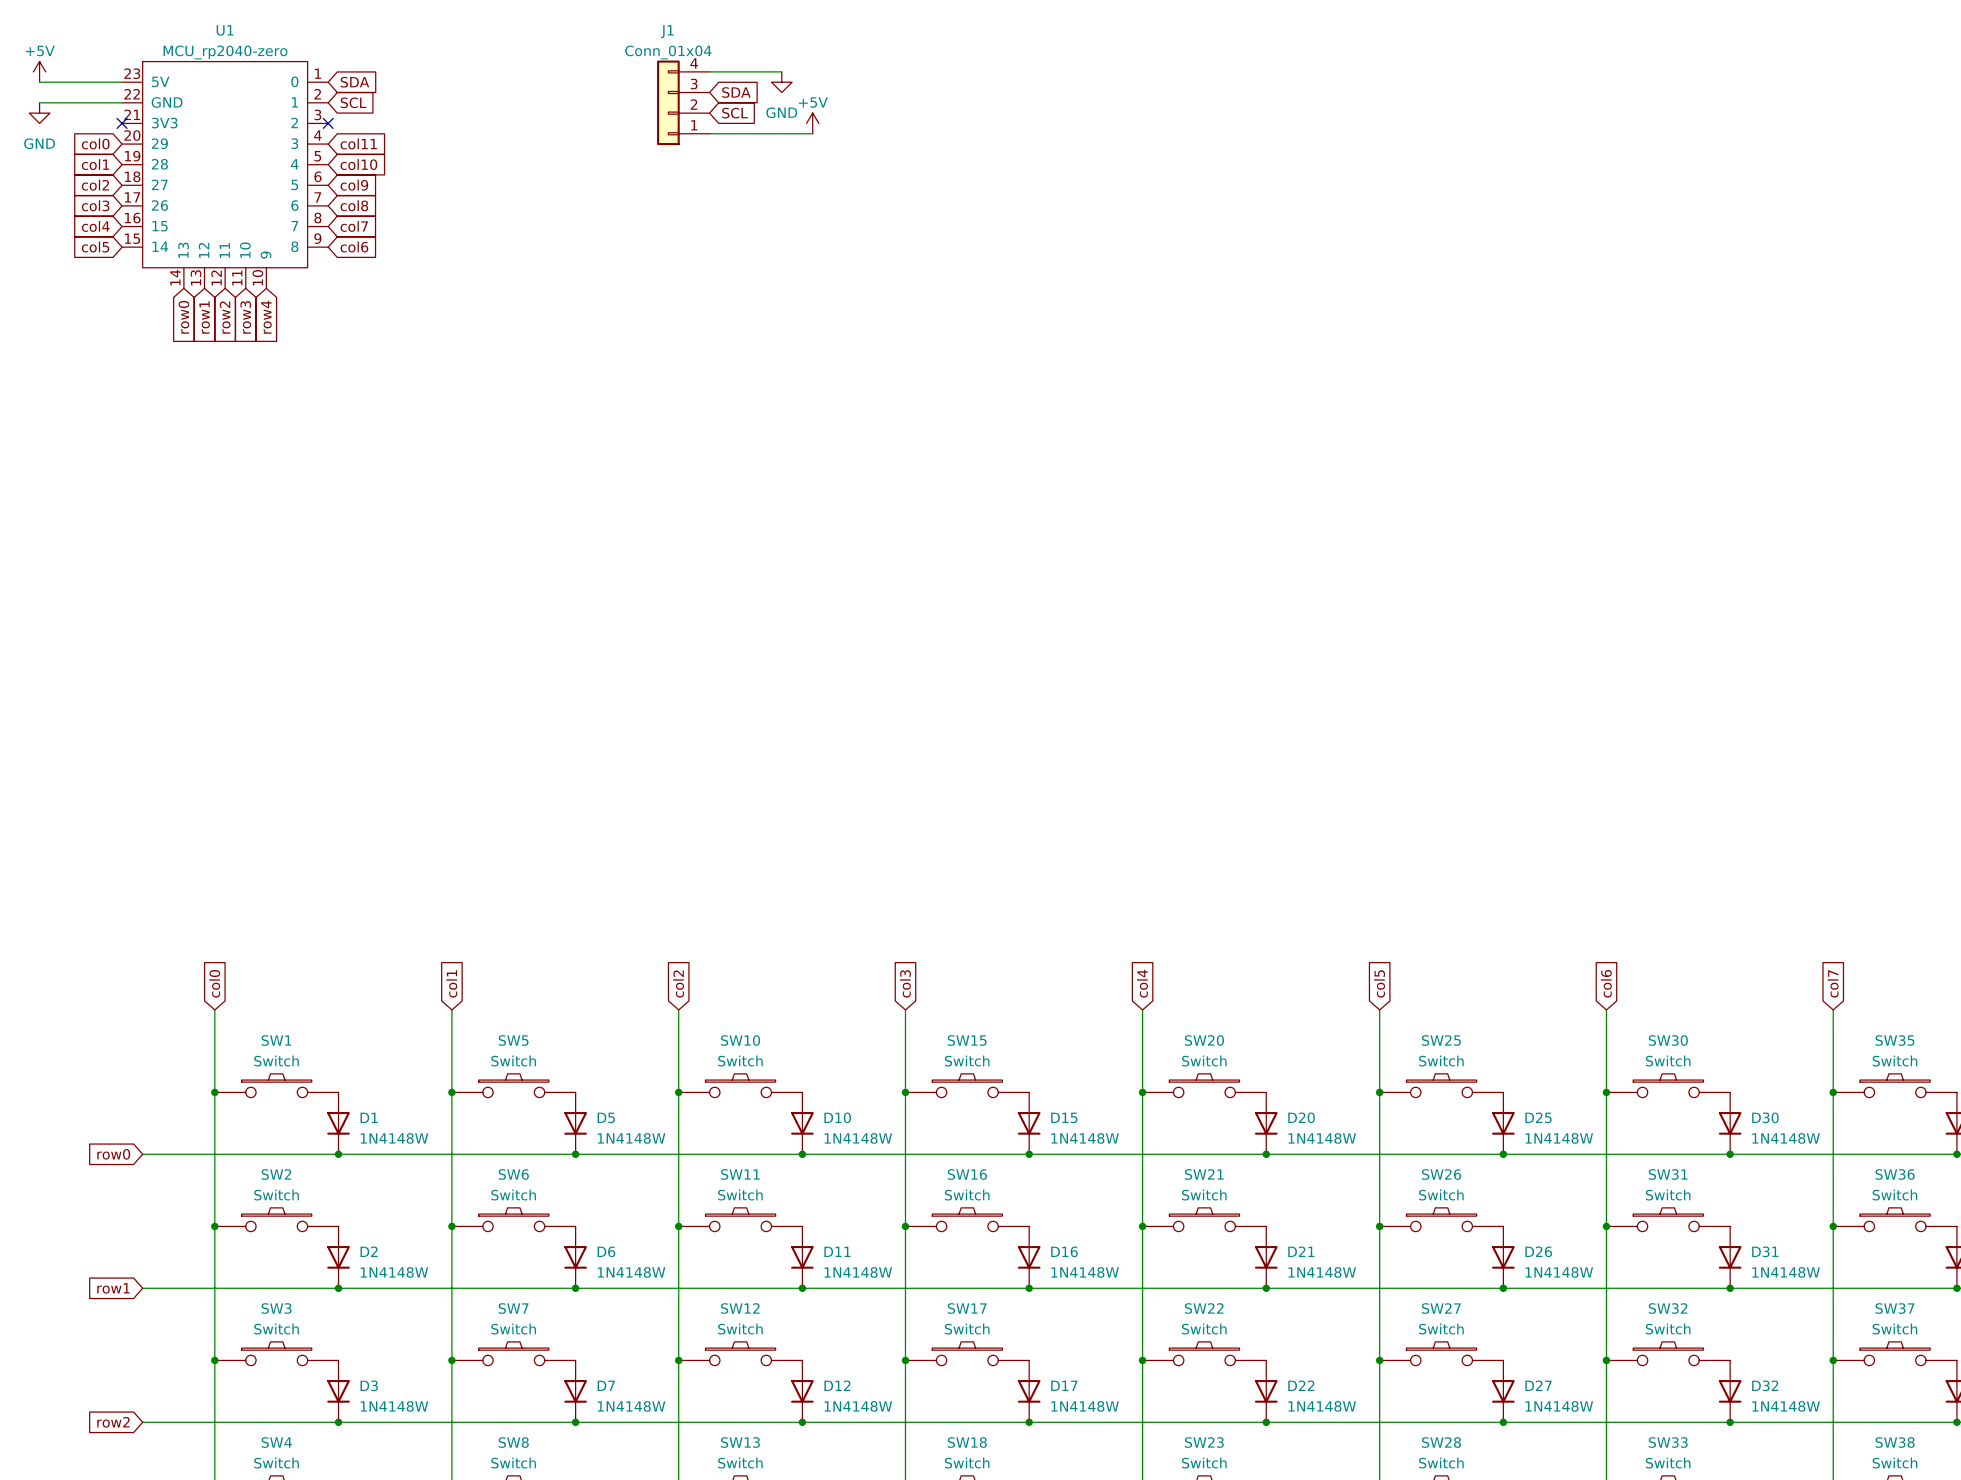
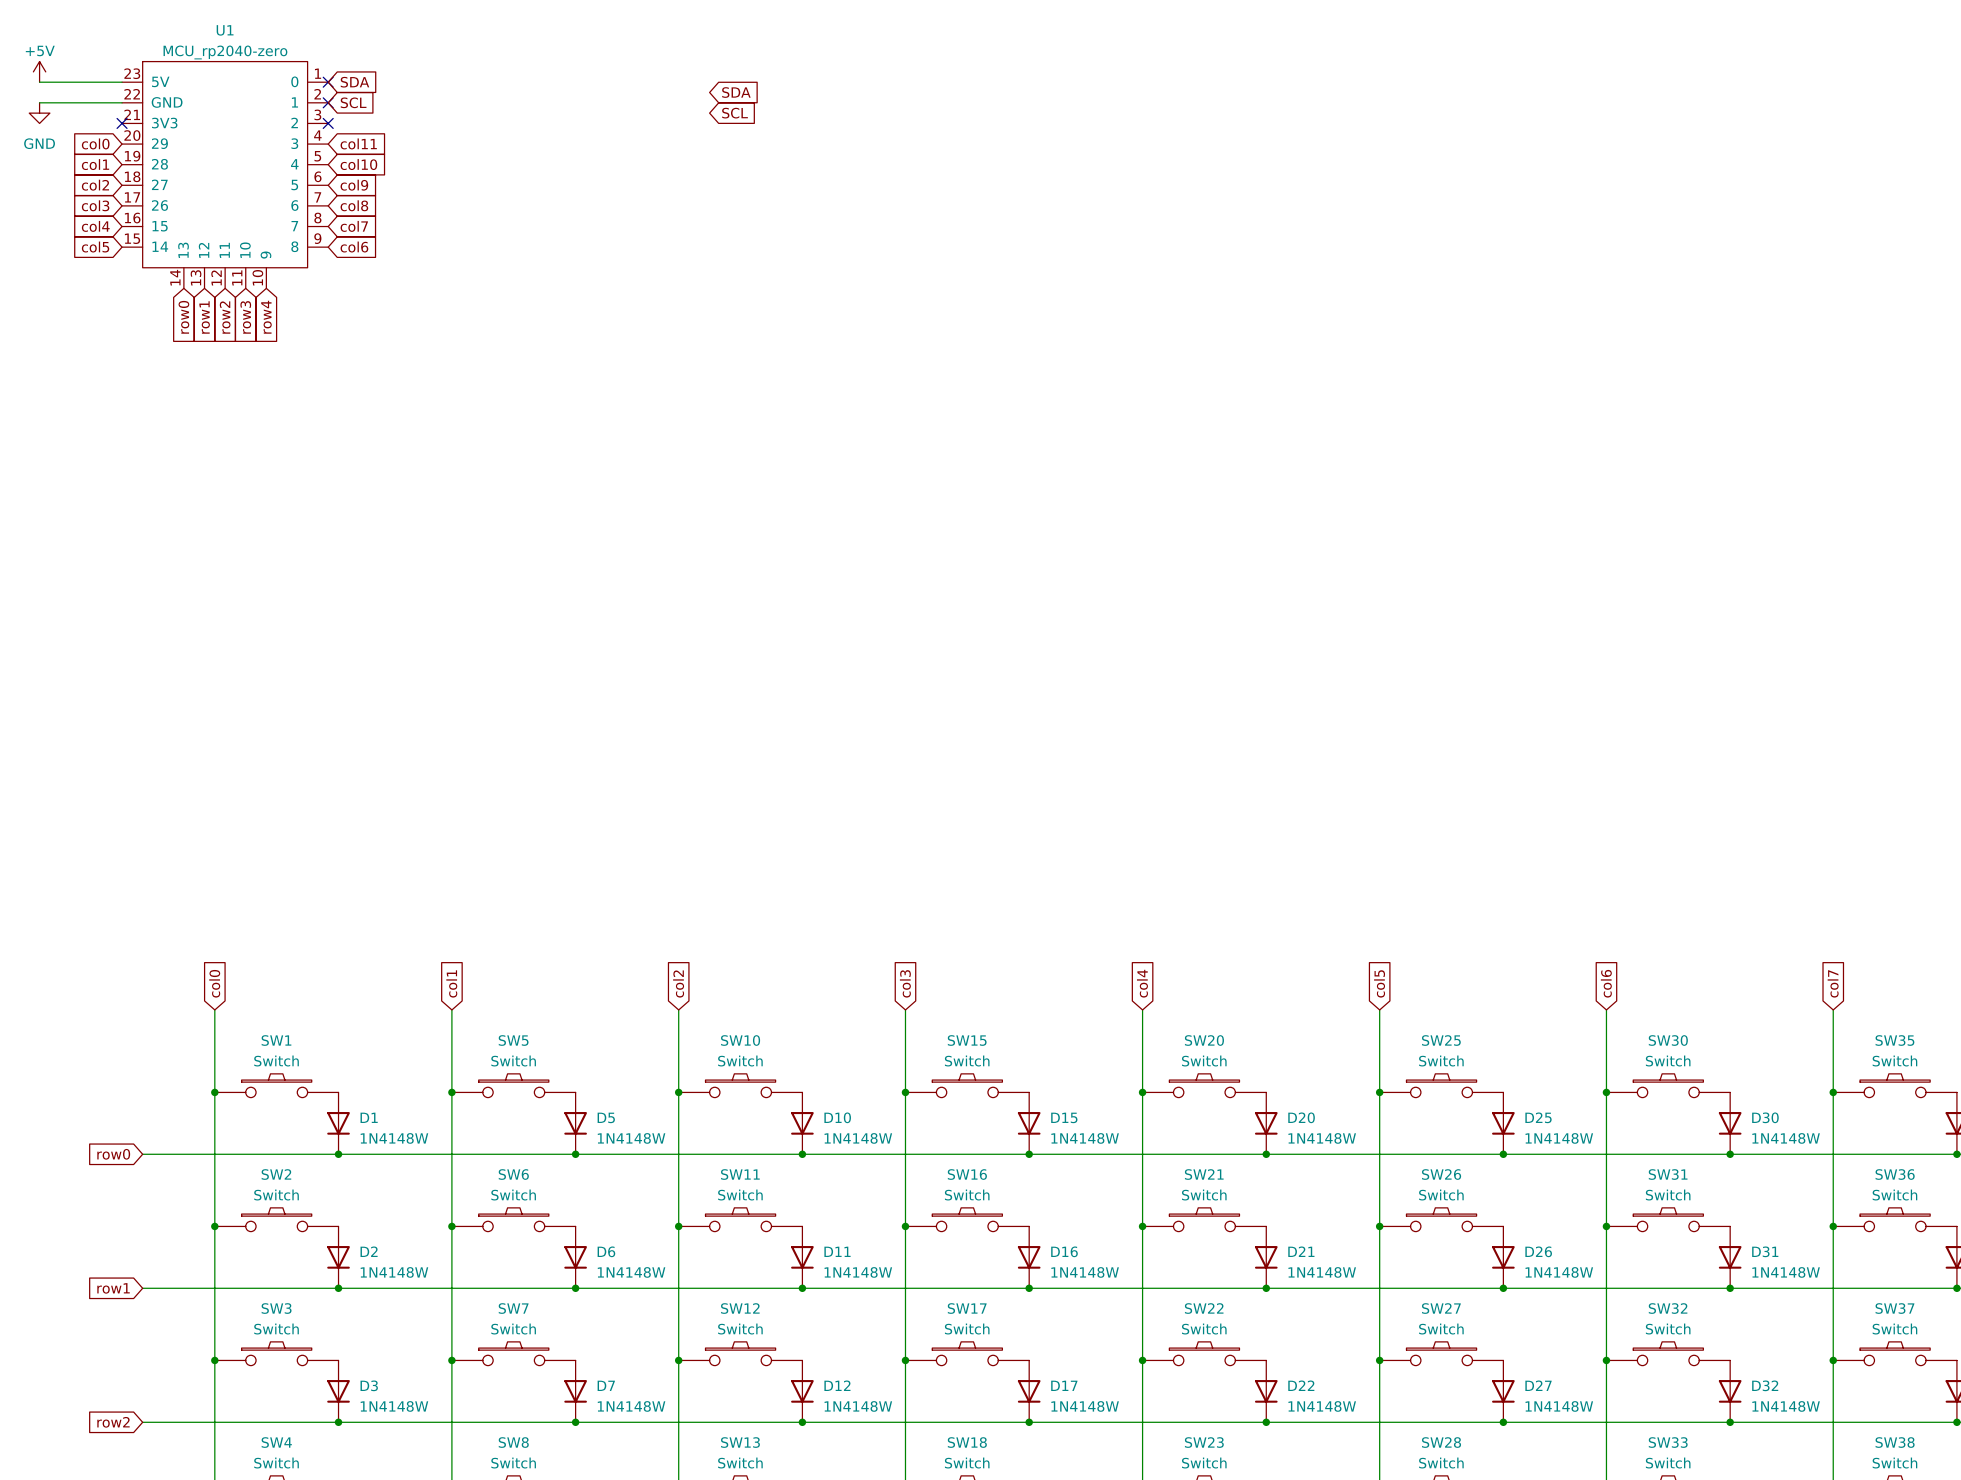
wire: (709, 71) (781, 71) -> none
no-connect mark: none -> (328, 82)
power symbol: GND (781, 82) -> none
no-connect mark: none -> (328, 102)
J1: Conn_01x04 (683, 102) -> none
power symbol: +5V (812, 123) -> none
wire: (709, 133) (812, 133) -> none

